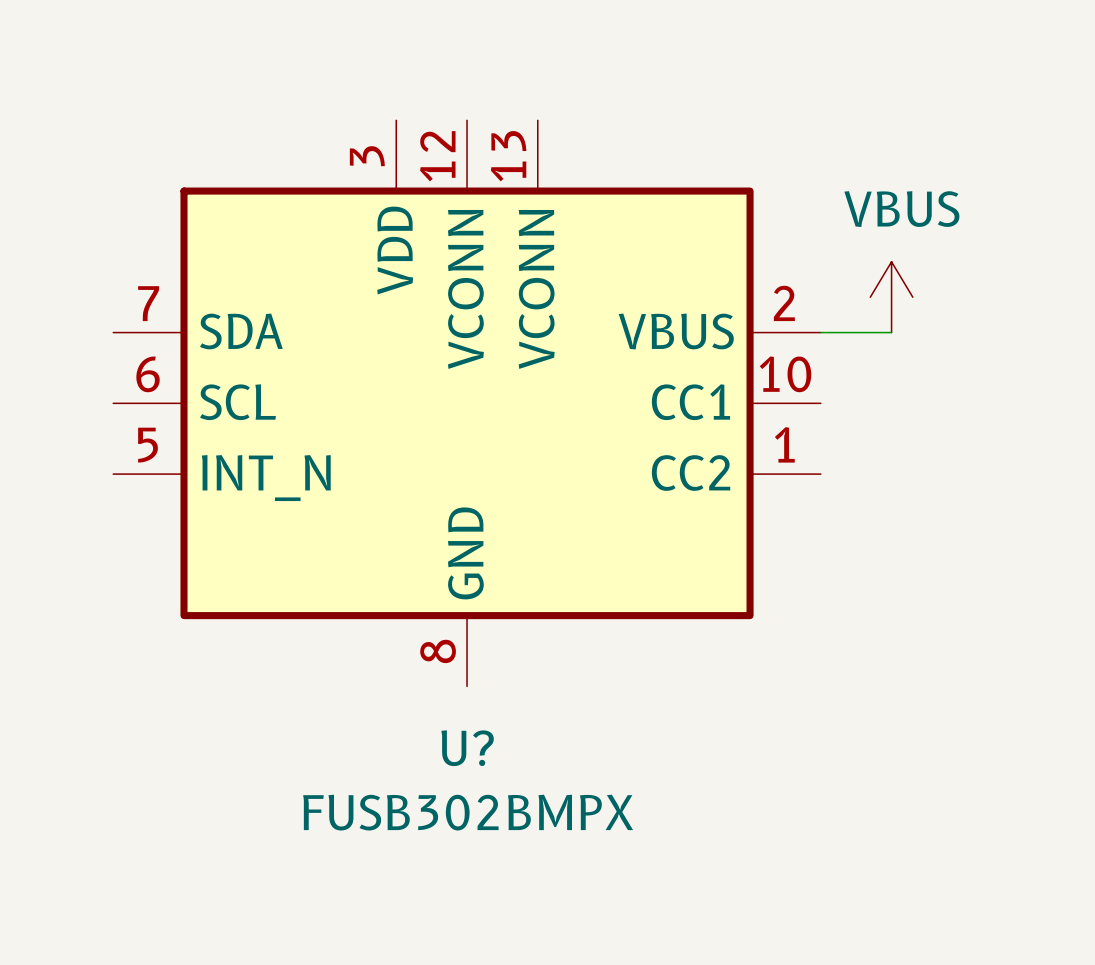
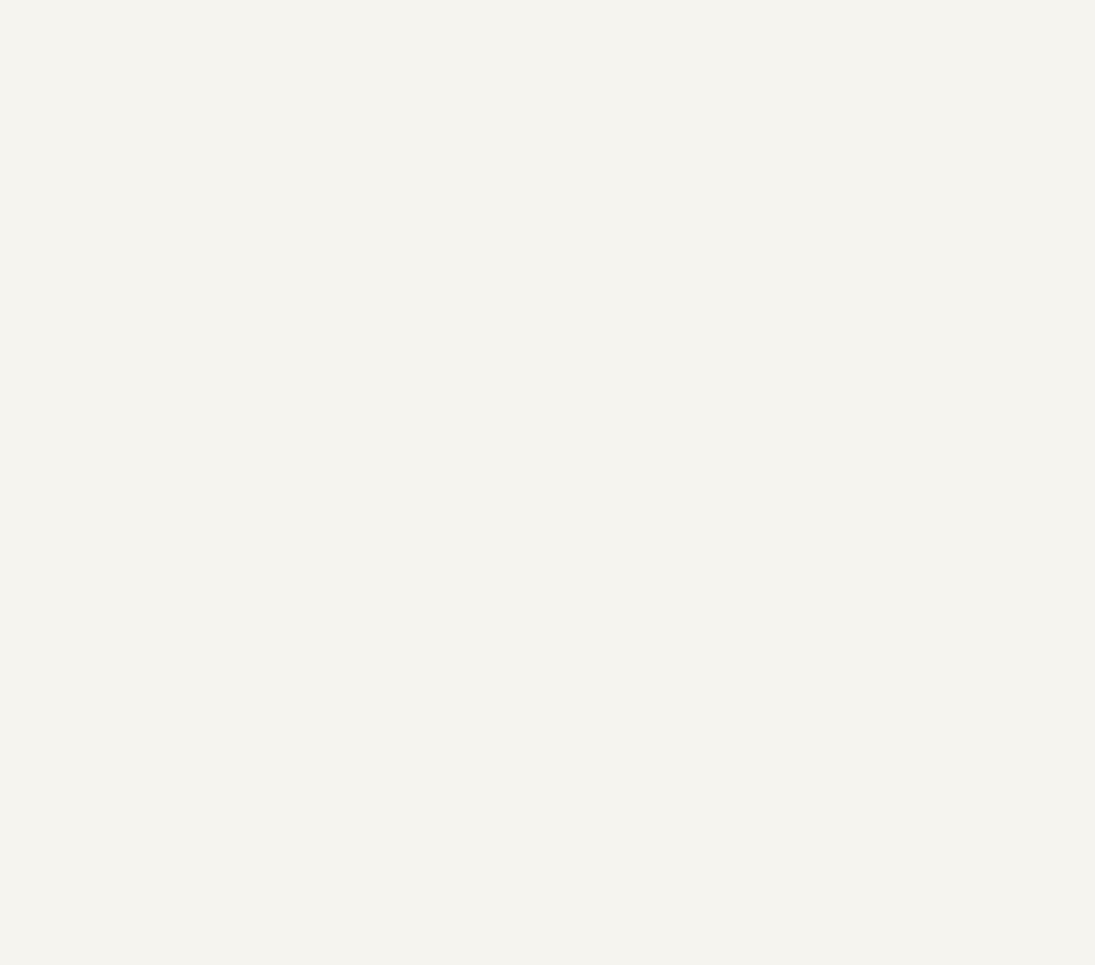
power symbol: VBUS (891, 297) -> none
wire: (820, 332) (891, 332) -> none
U?: FUSB302BMPX (467, 403) -> none

